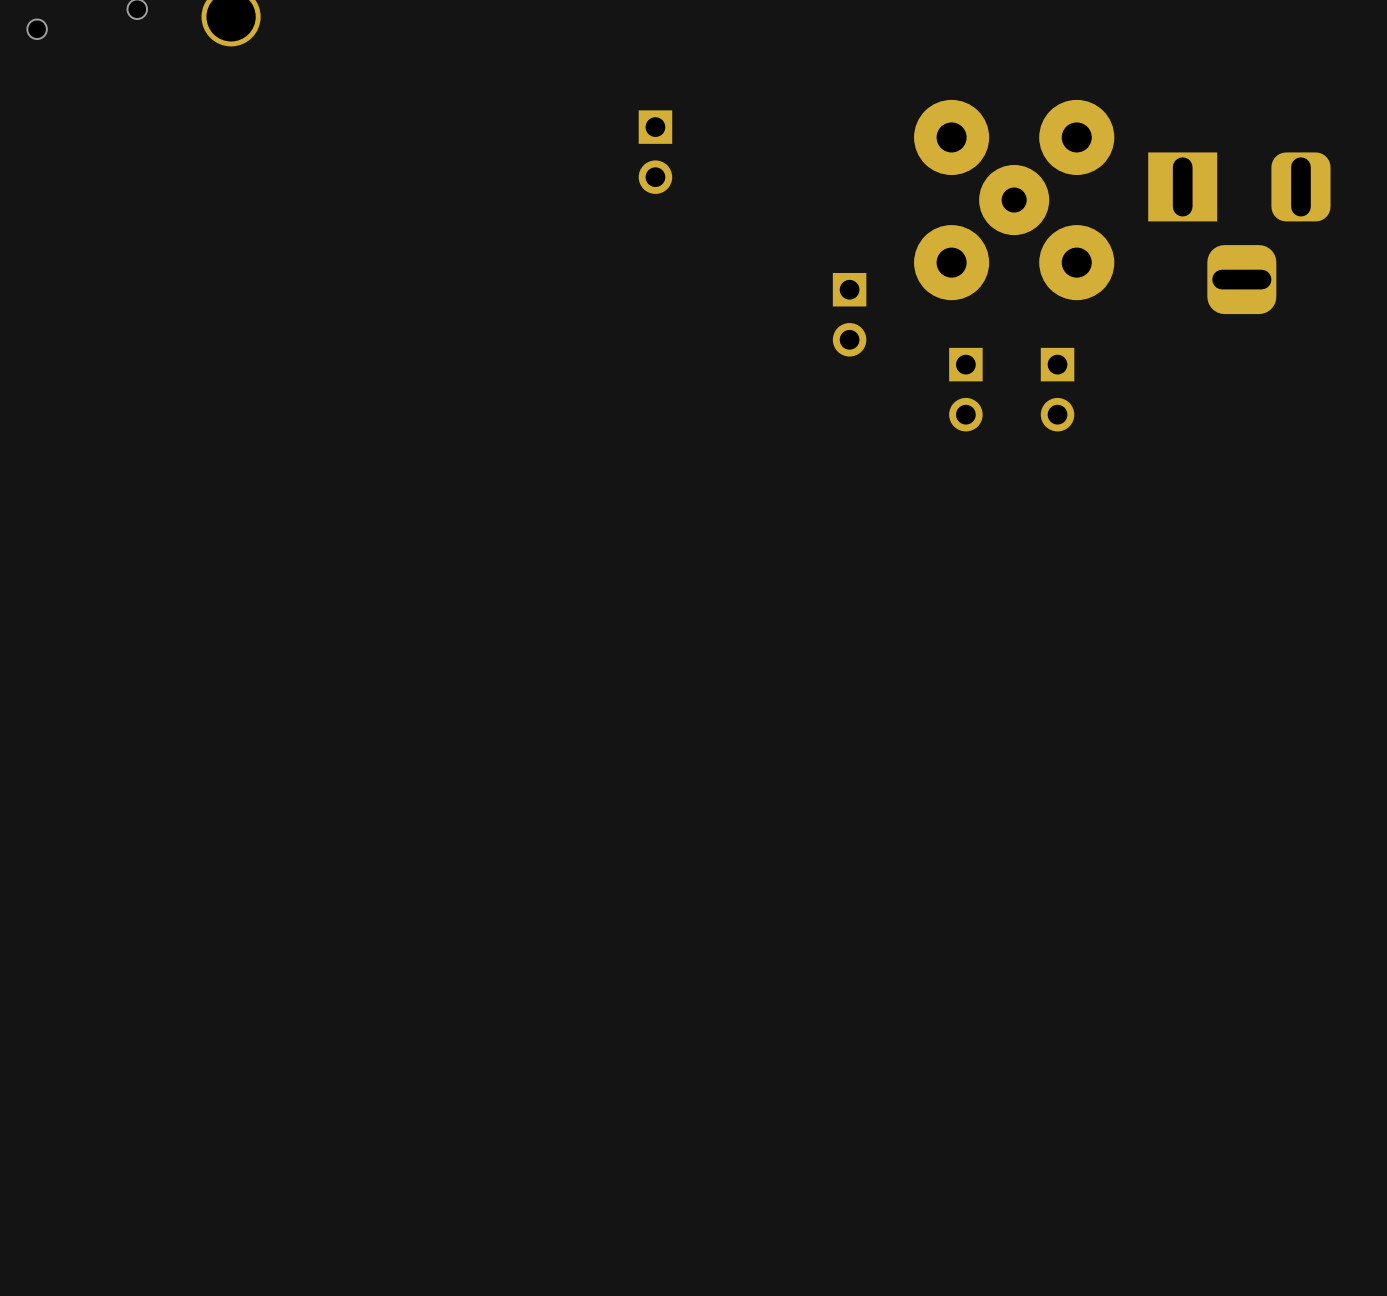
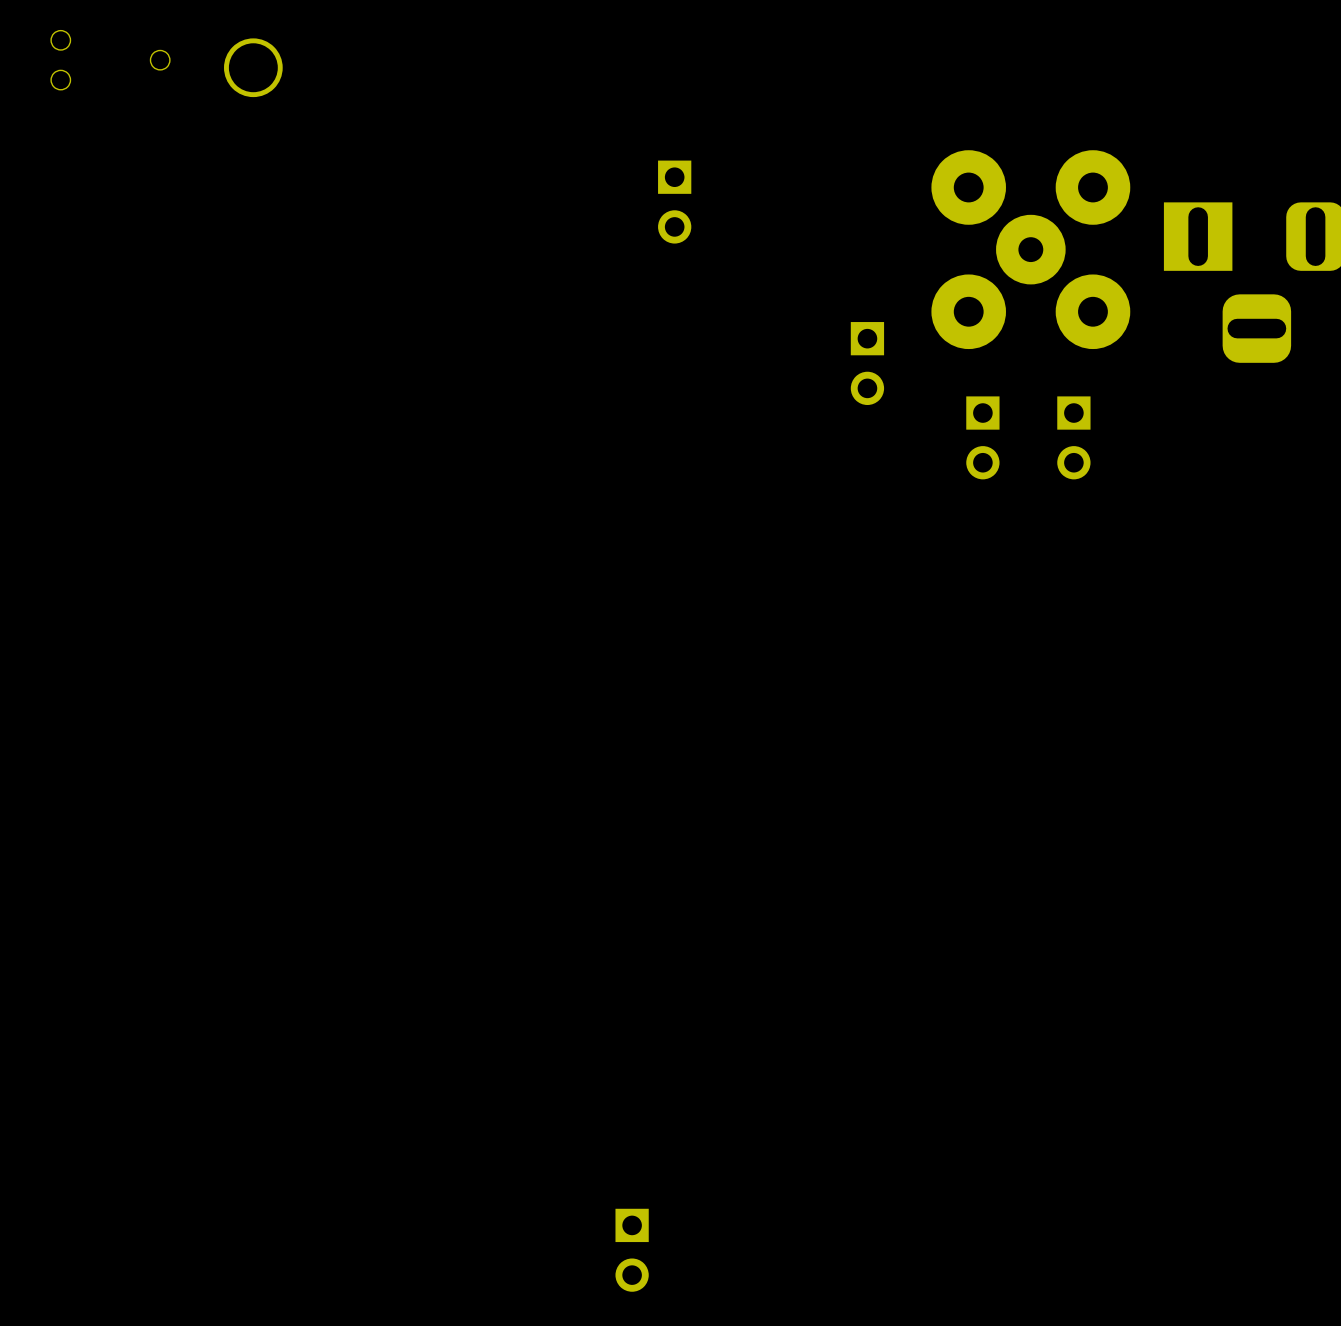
part: none -> (632, 1250)

